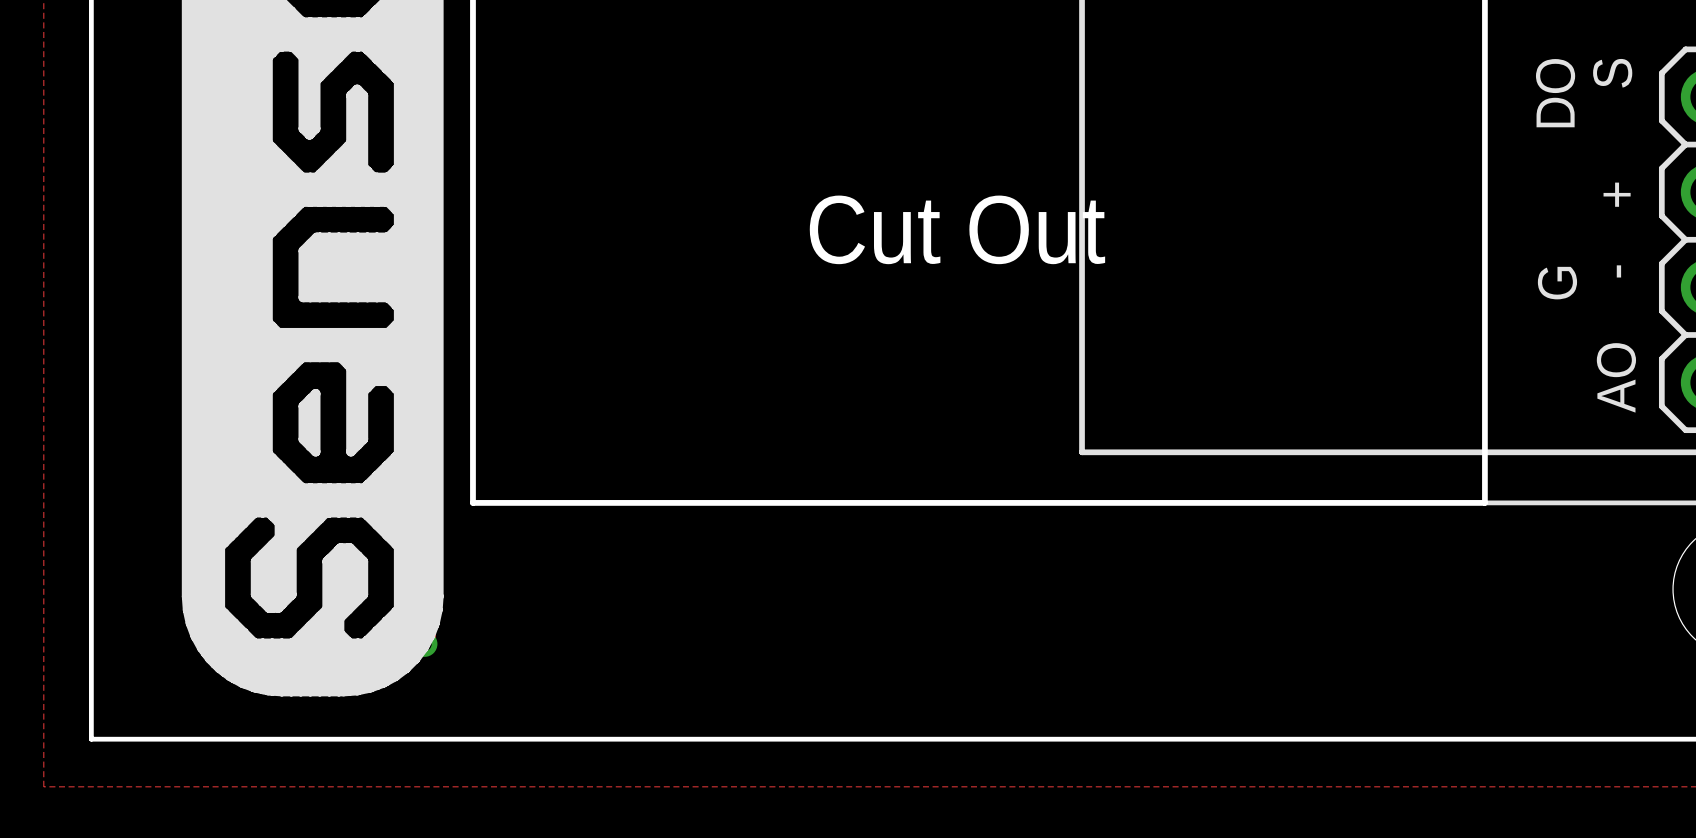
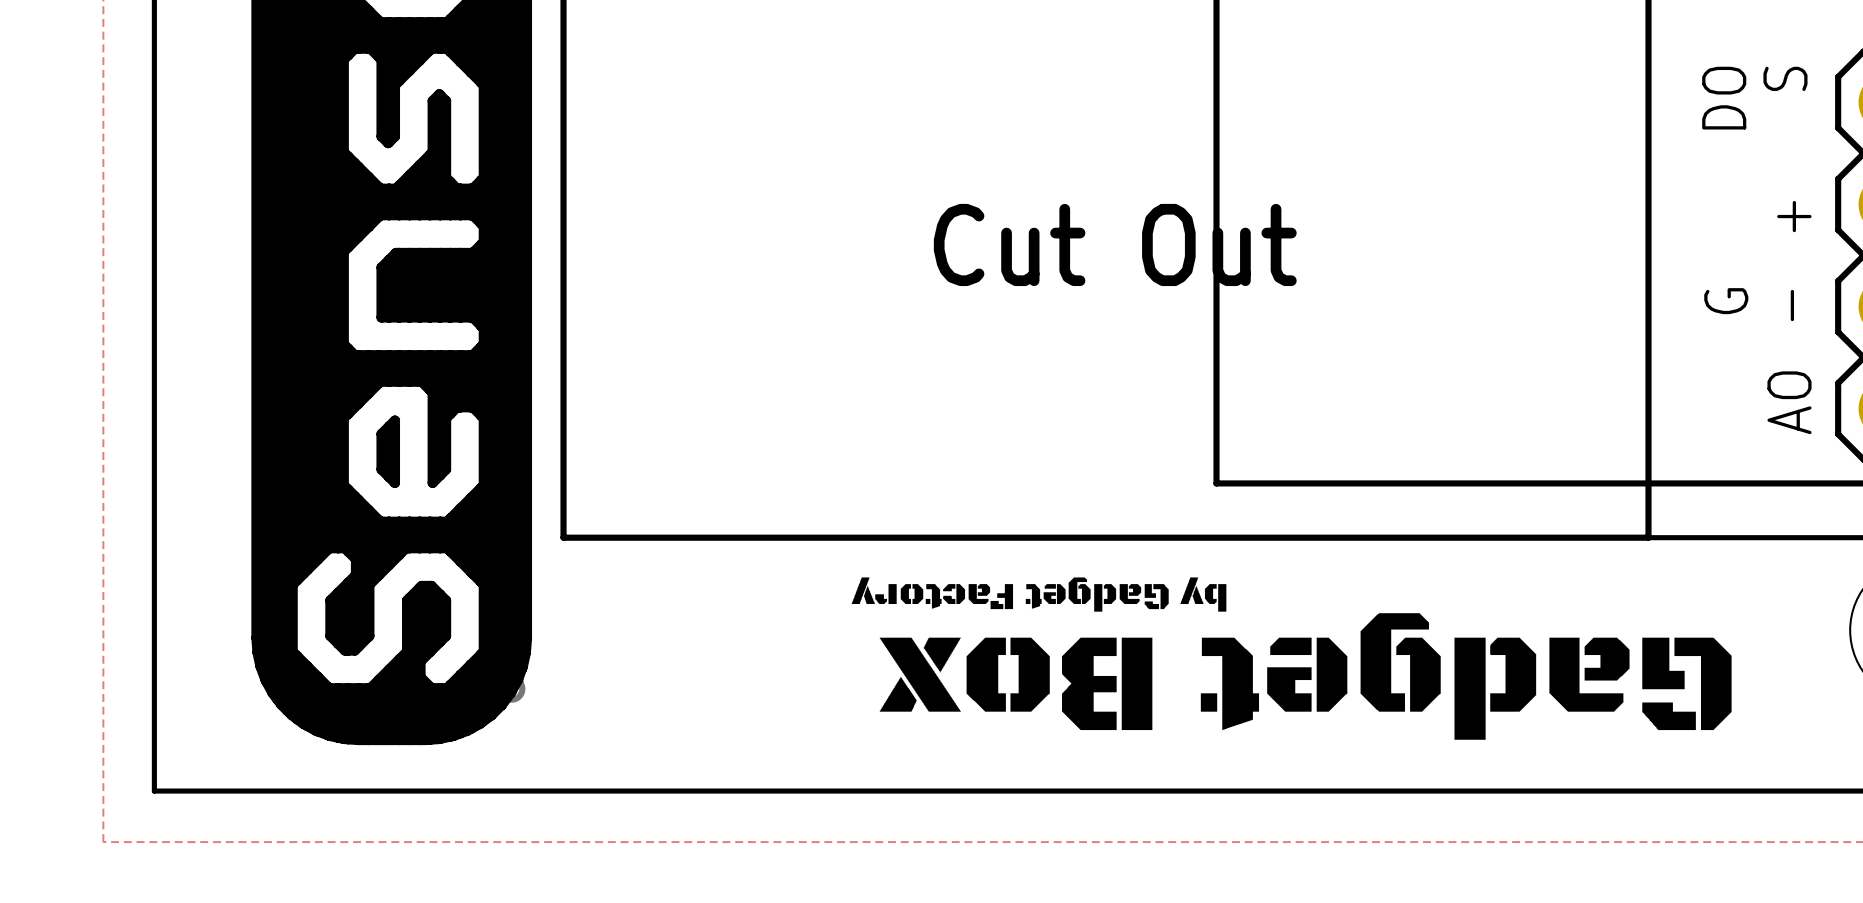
drawing: none -> [851, 577, 1732, 740]

